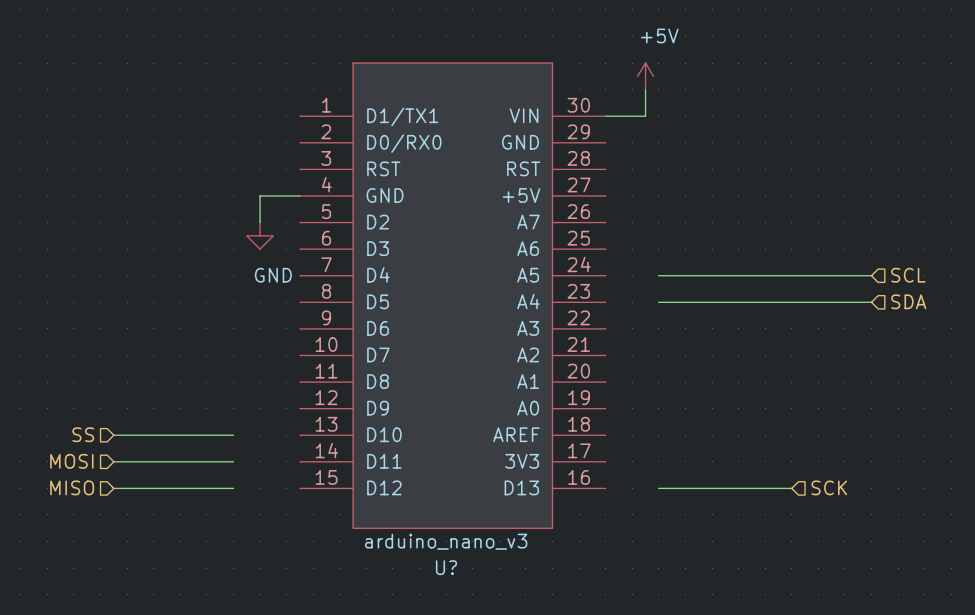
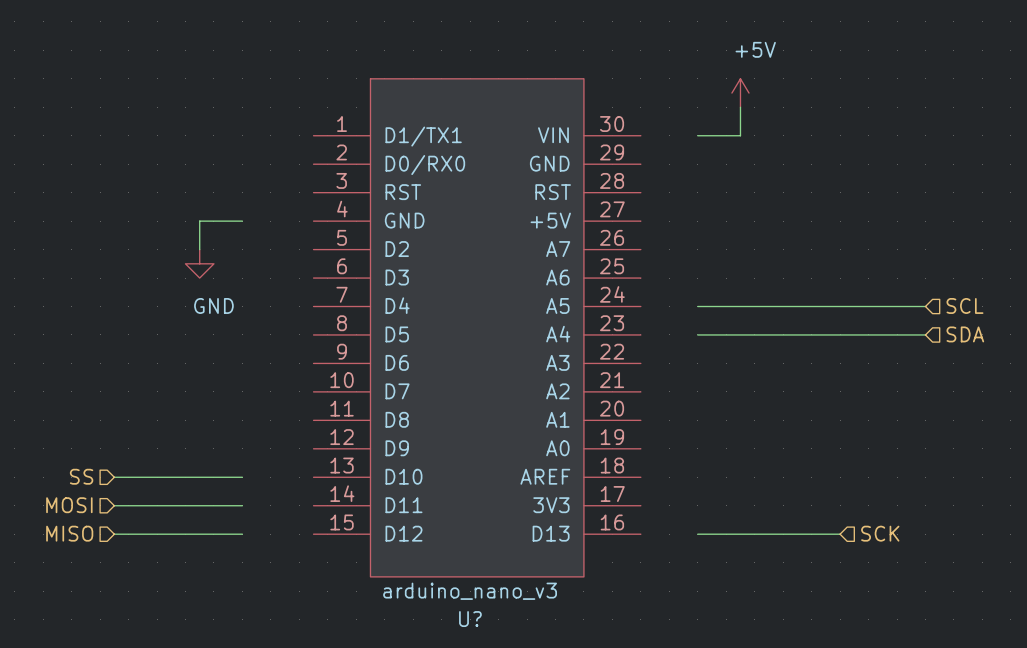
power symbol position: +5V (645, 76) -> +5V (740, 93)
wire: (645, 89) (645, 116) (605, 116) -> (740, 107) (740, 135) (697, 135)
wire: (299, 195) (260, 195) (260, 222) -> (242, 221) (199, 221) (199, 249)
power symbol position: GND (260, 235) -> GND (199, 263)

